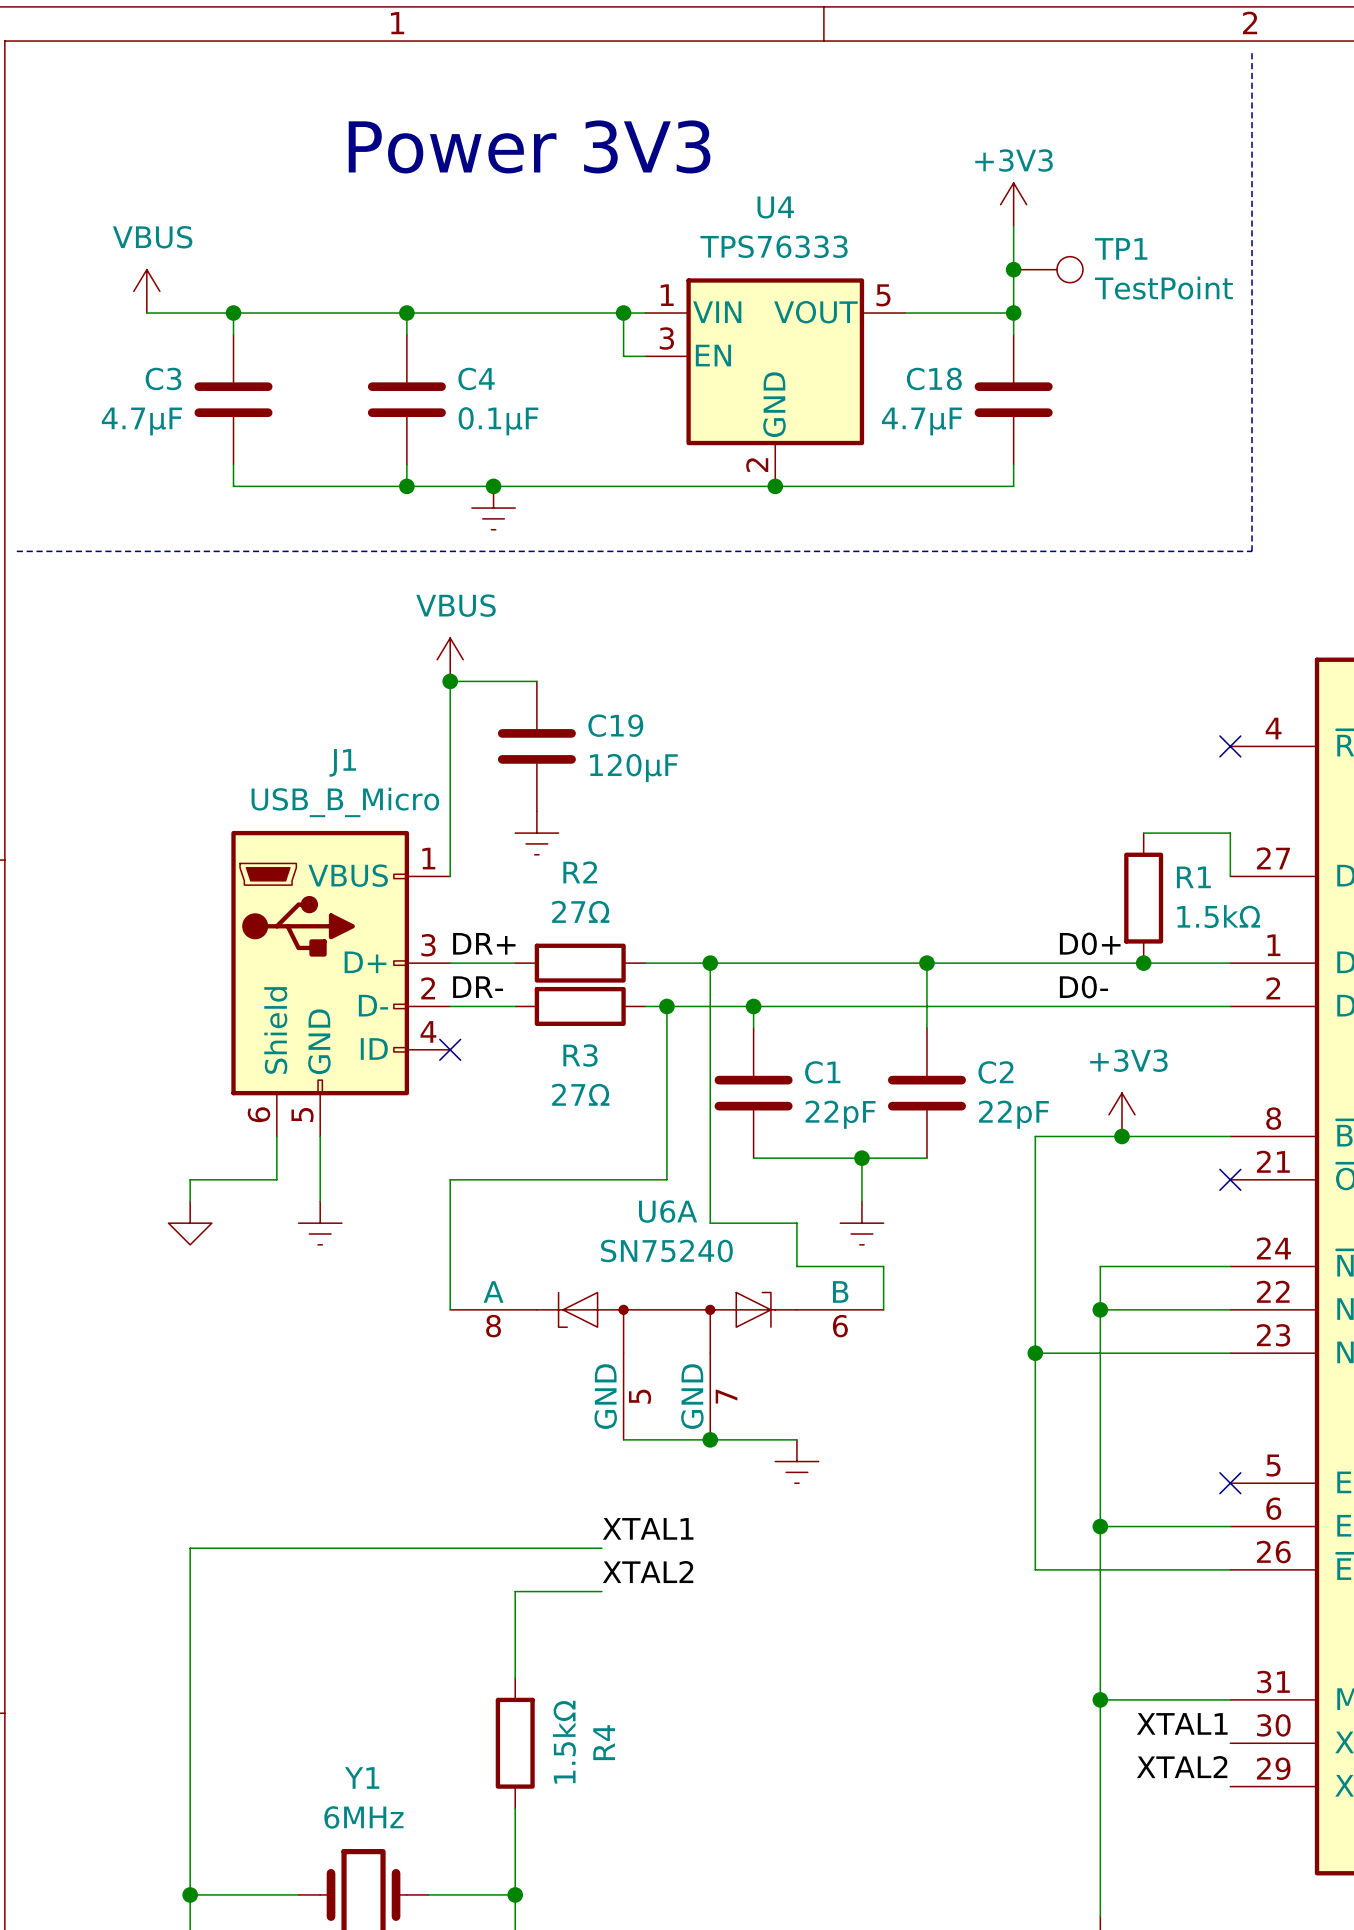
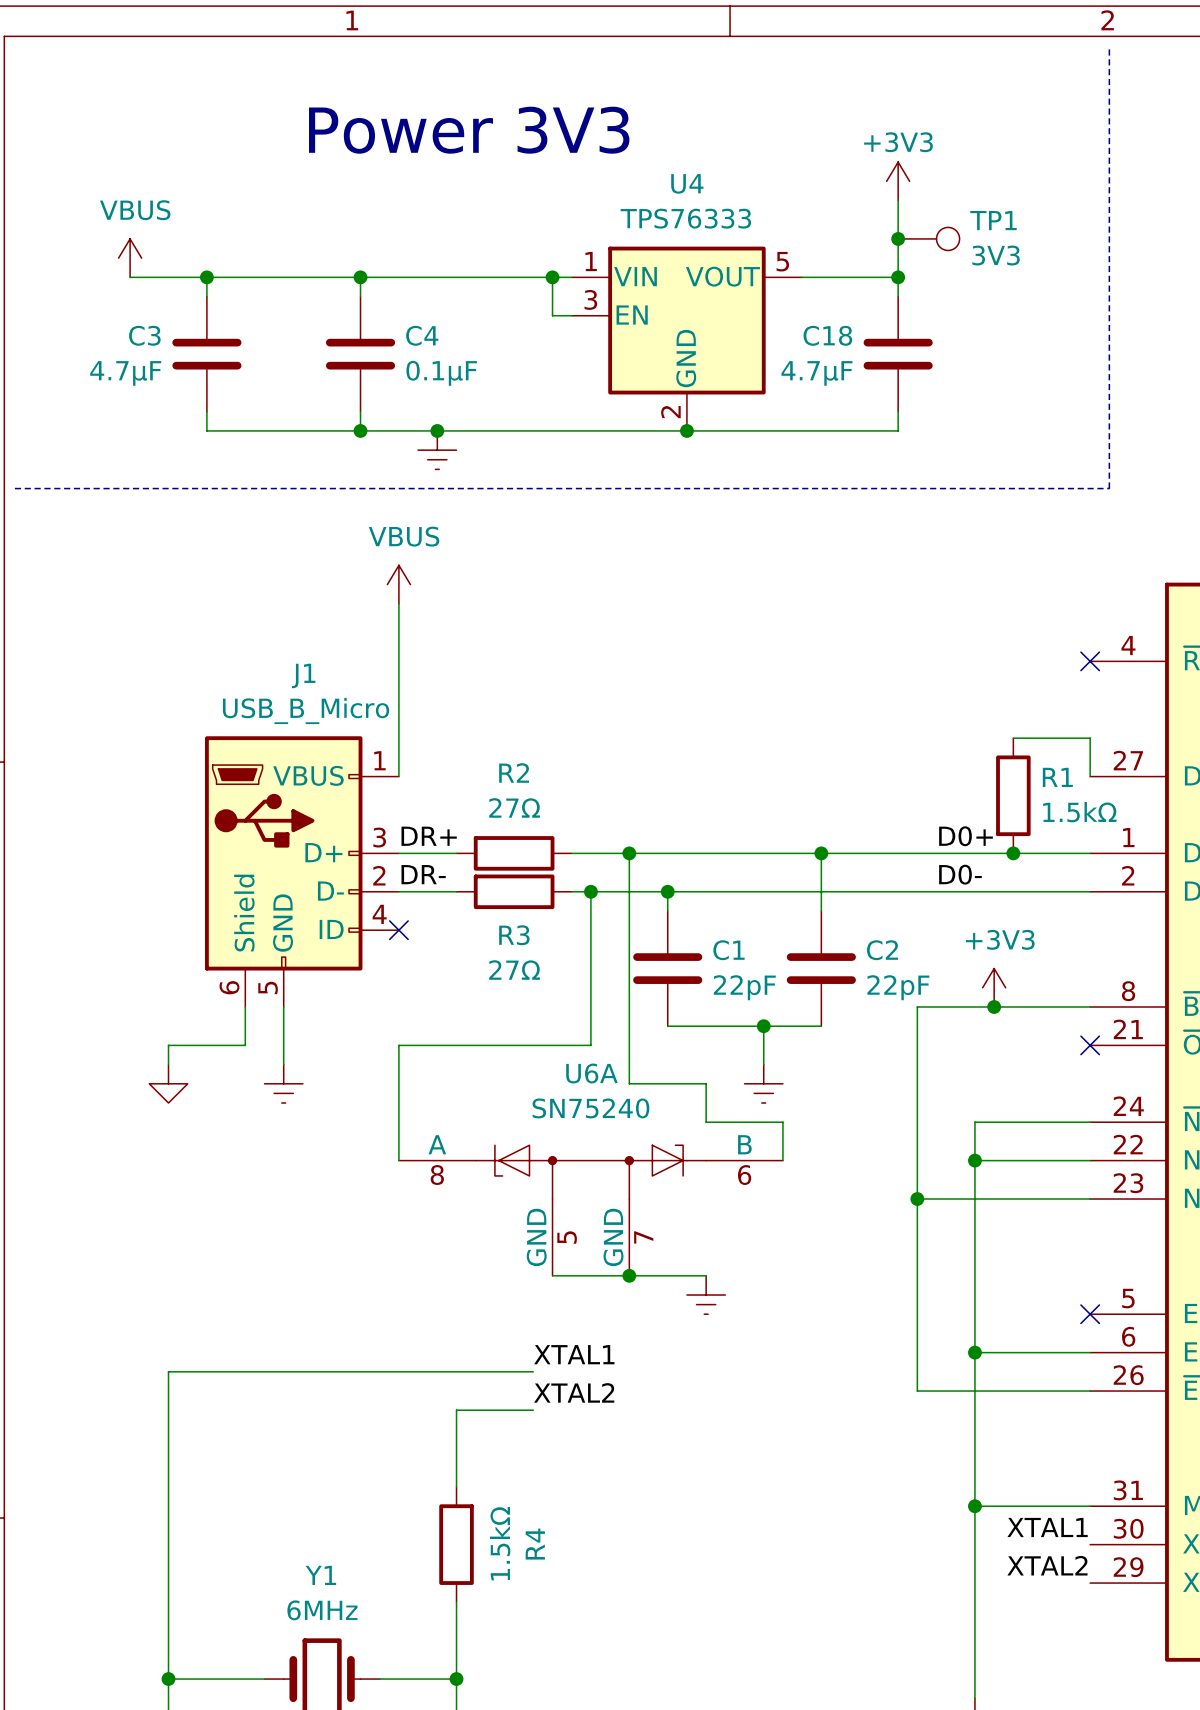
TP1 value: TestPoint (1163, 288) -> 3V3 (996, 255)
wire: (450, 681) (536, 681) -> none
junction: (450, 681) -> none
C19: 120μF (536, 746) -> none
power symbol: (536, 833) -> none

